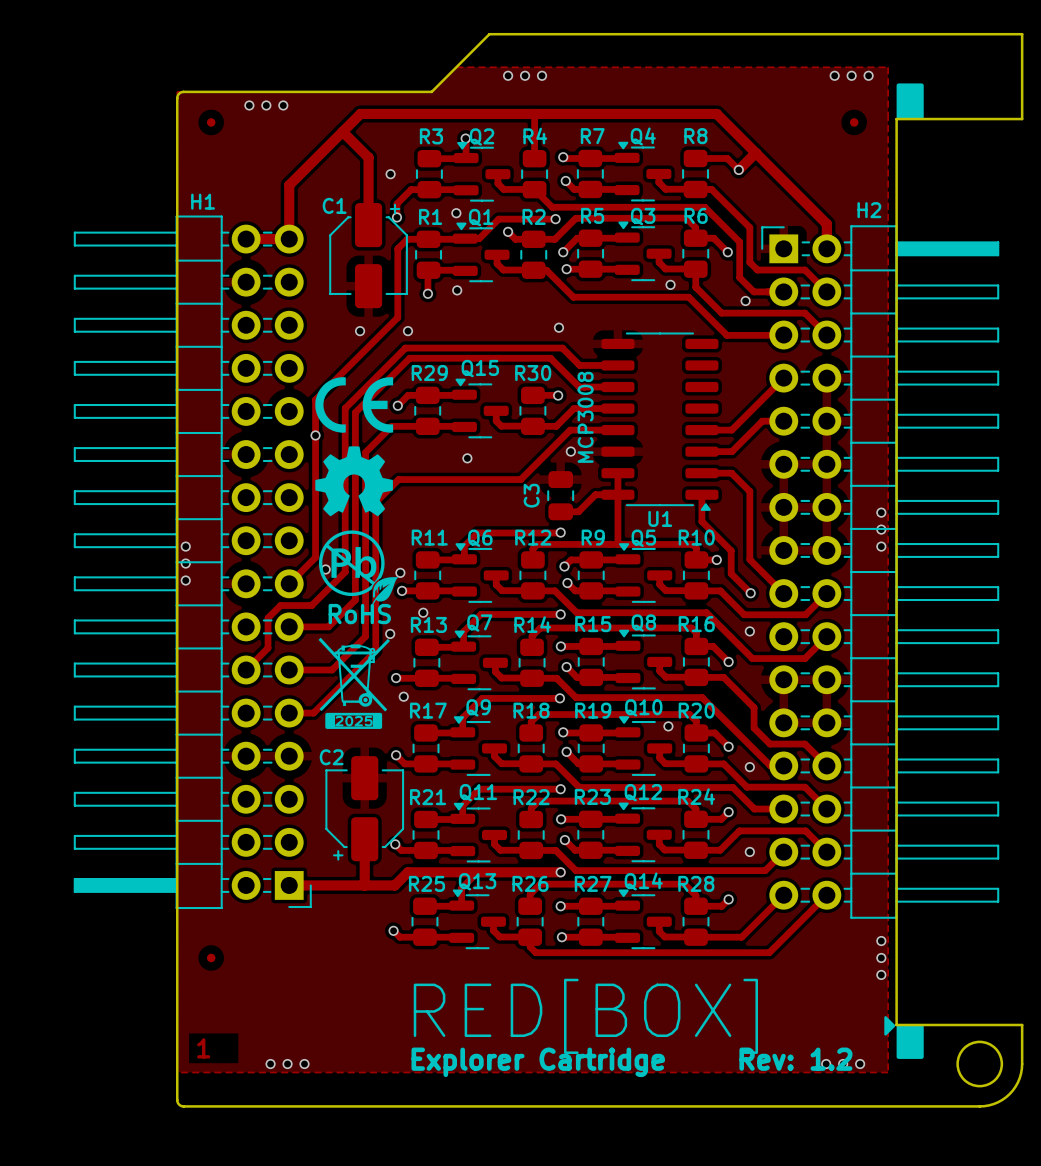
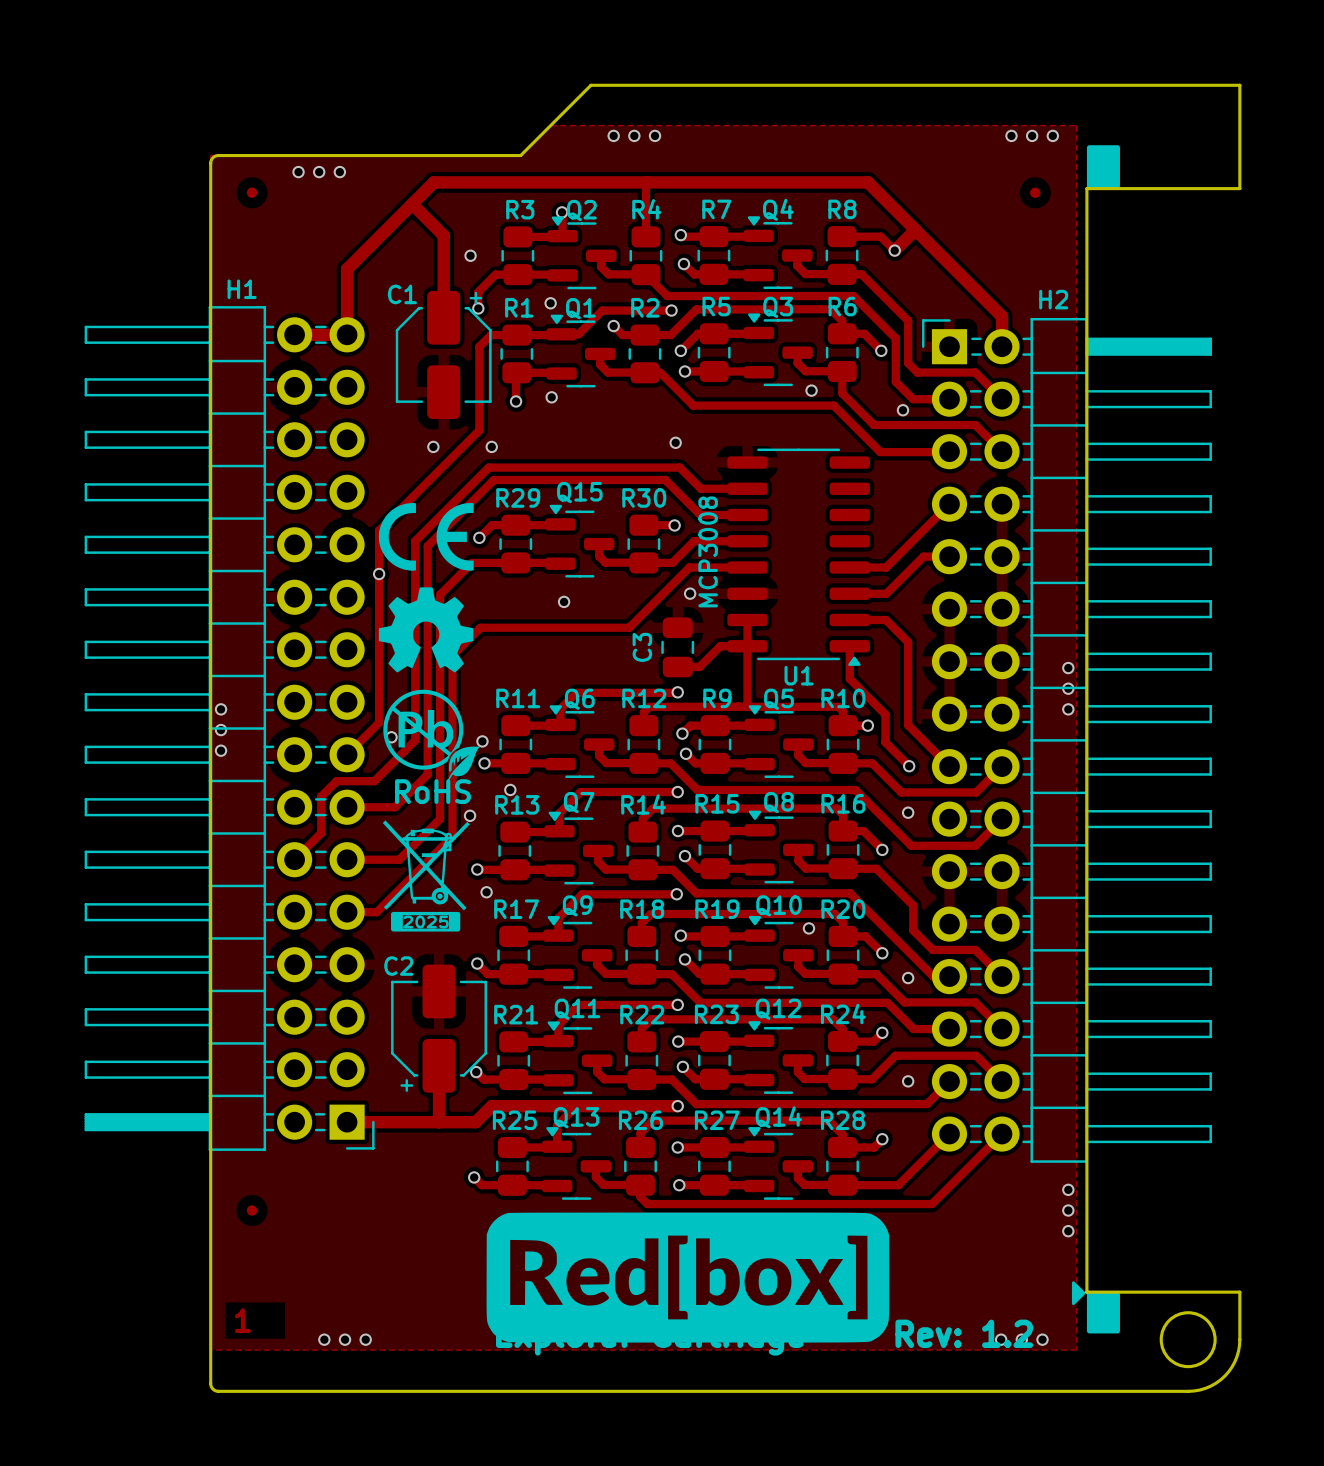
drawing: none -> [486, 1212, 890, 1343]
text: RED[BOX] (585, 1016) -> none

